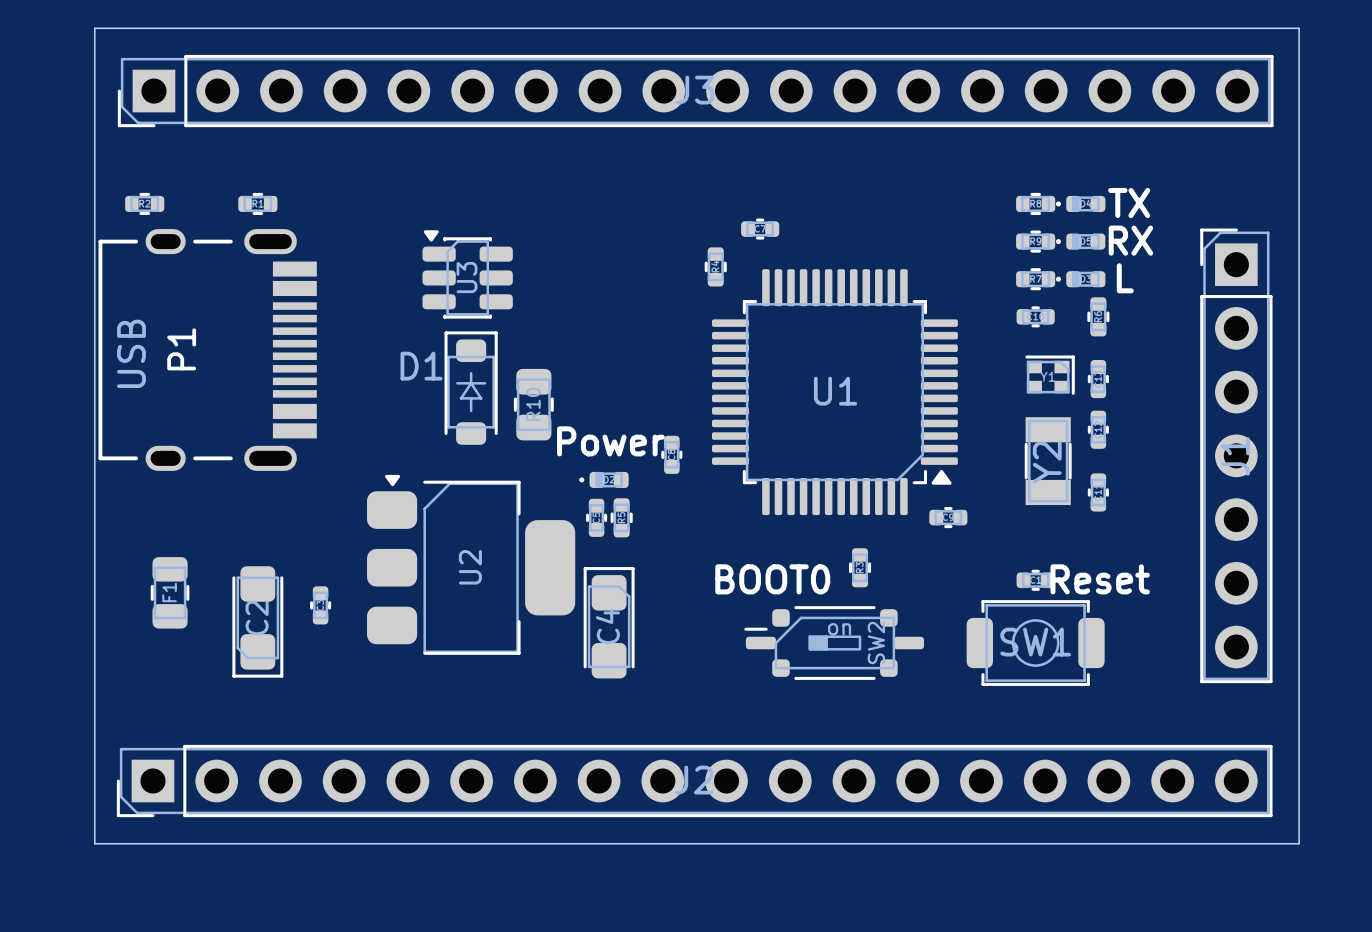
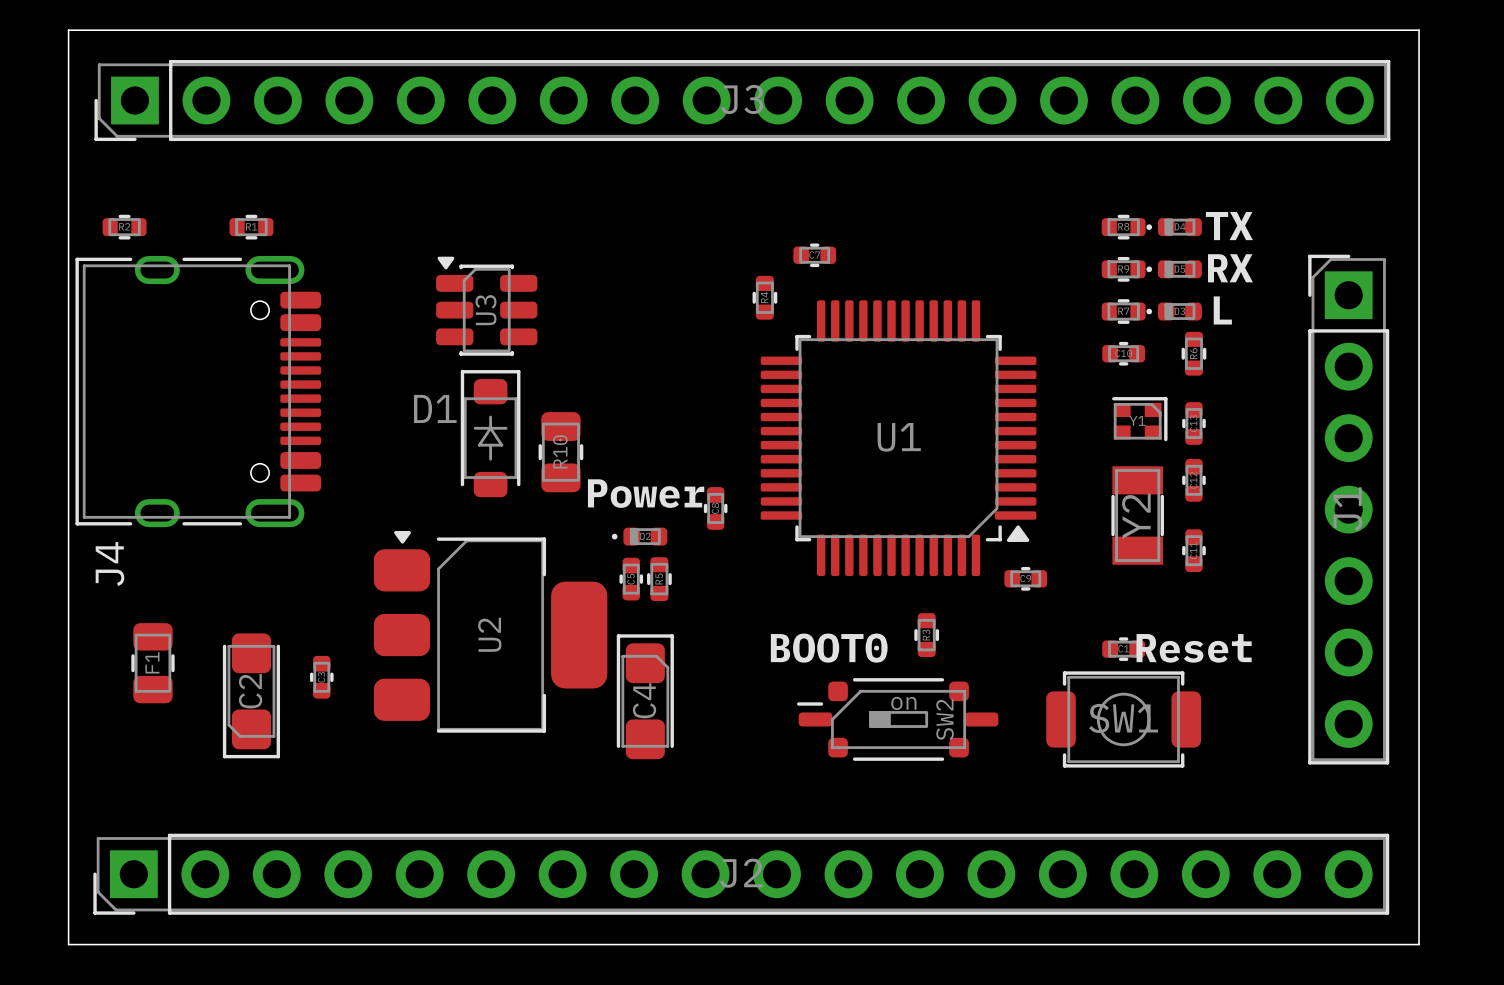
P1: USB (207, 349) -> none
J4: none -> (198, 391)

